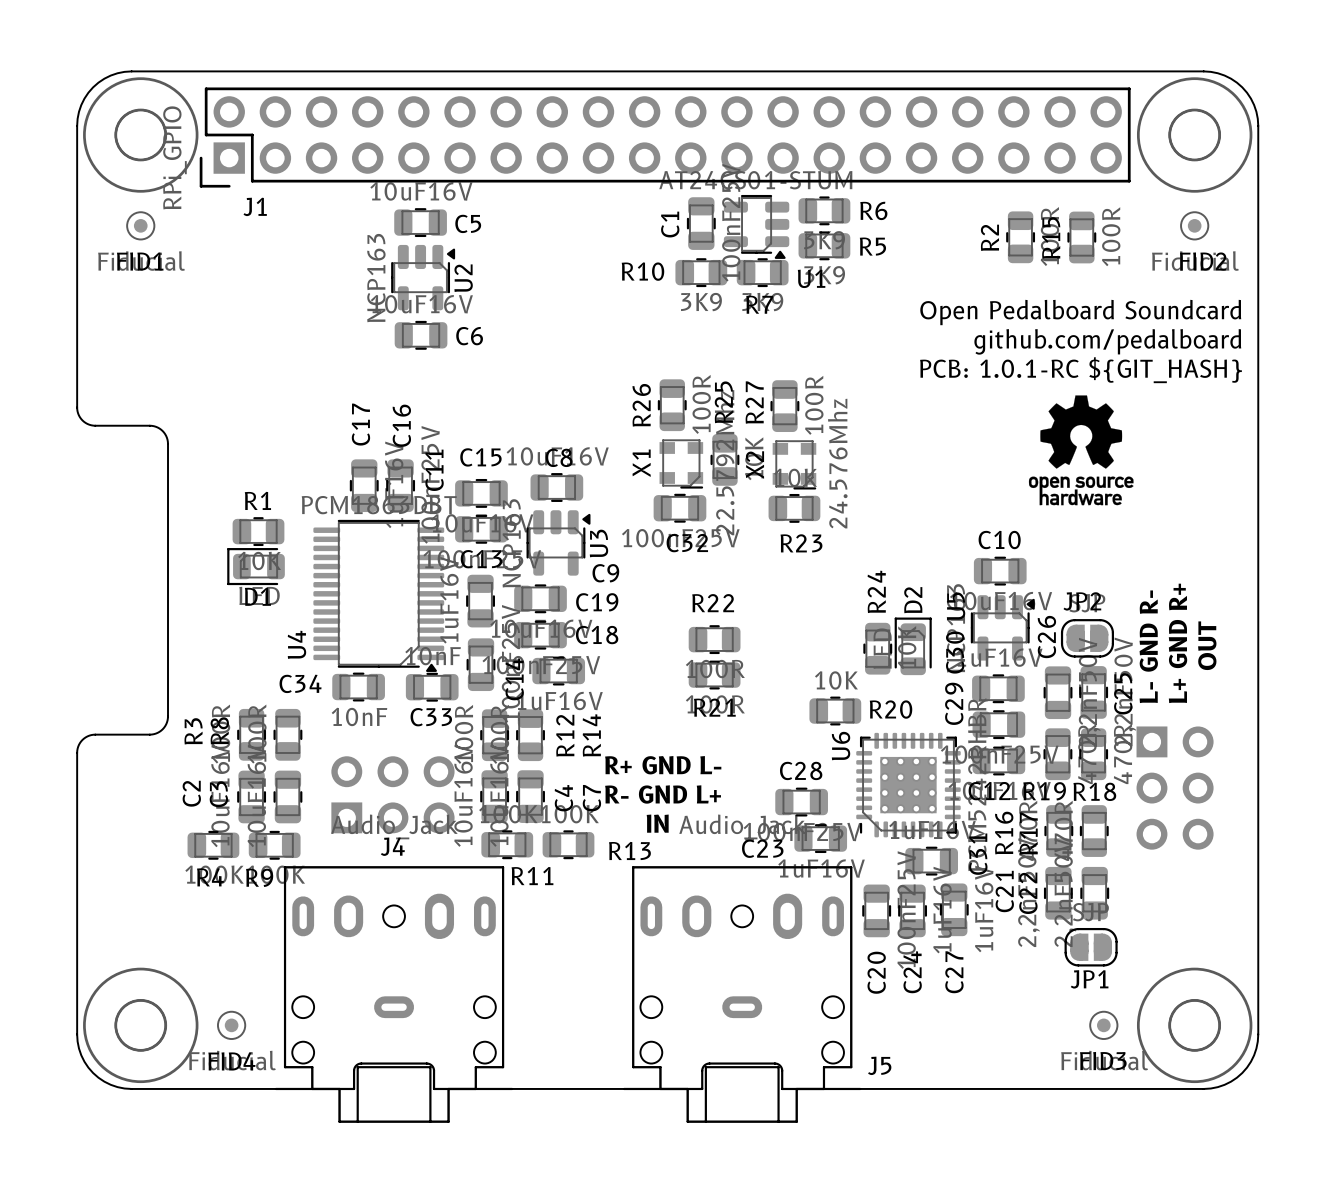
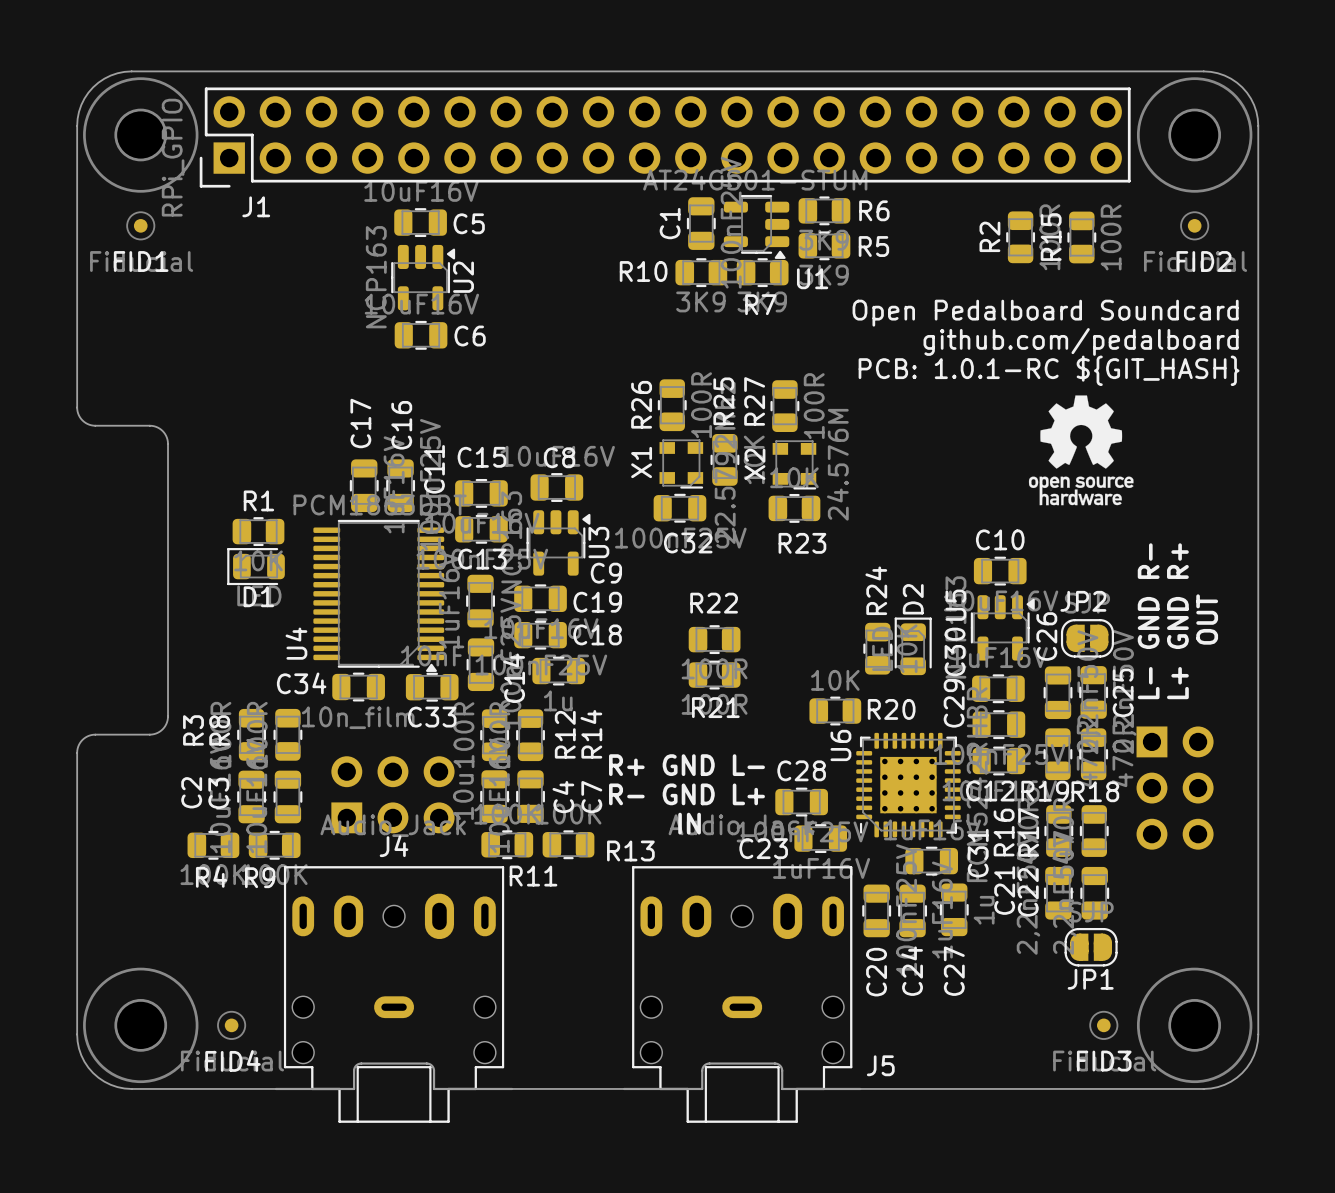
X2 value: 24.576Mhz (837, 463) -> 24.576M (837, 464)
C18 value: 1uF16V (559, 701) -> 1u (558, 700)
C34 value: 10nF (359, 716) -> 10n_film (358, 717)
C4 value: 10uF16V (463, 795) -> 10u (463, 797)
C27 value: 1uF16V (984, 908) -> 1u (984, 910)

